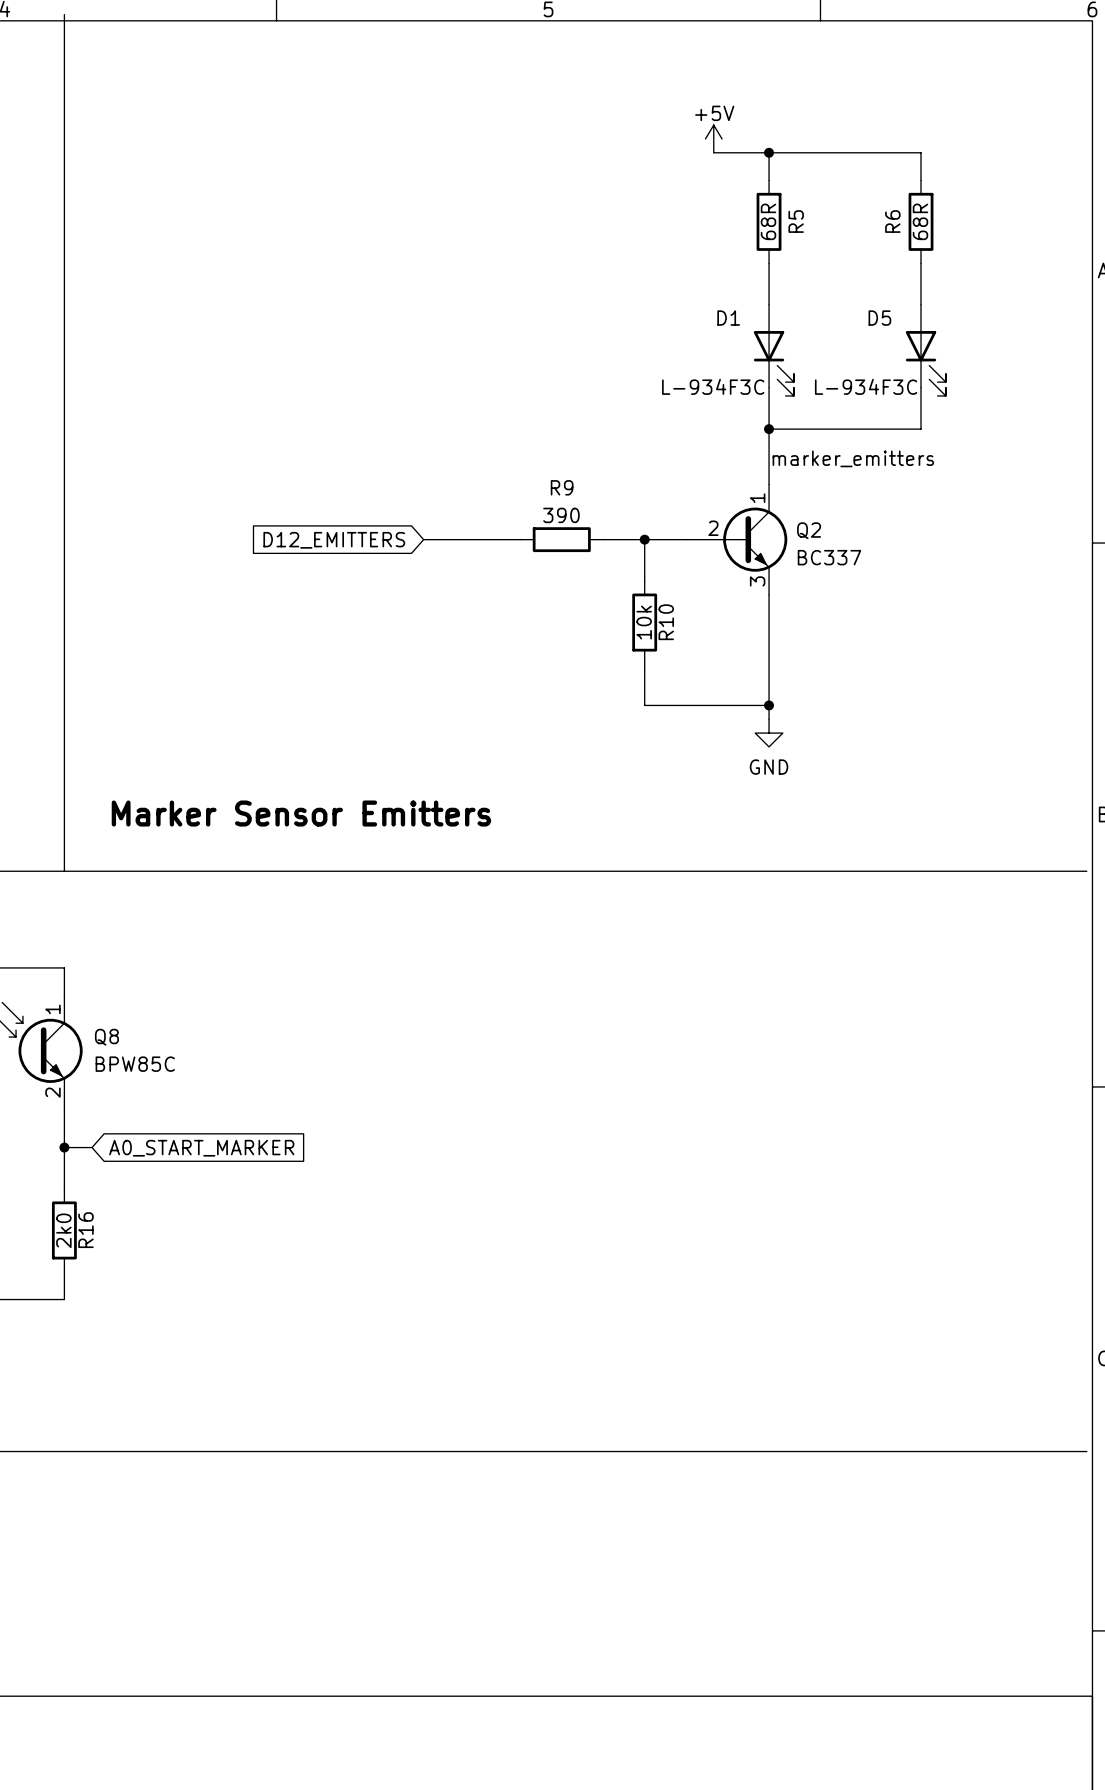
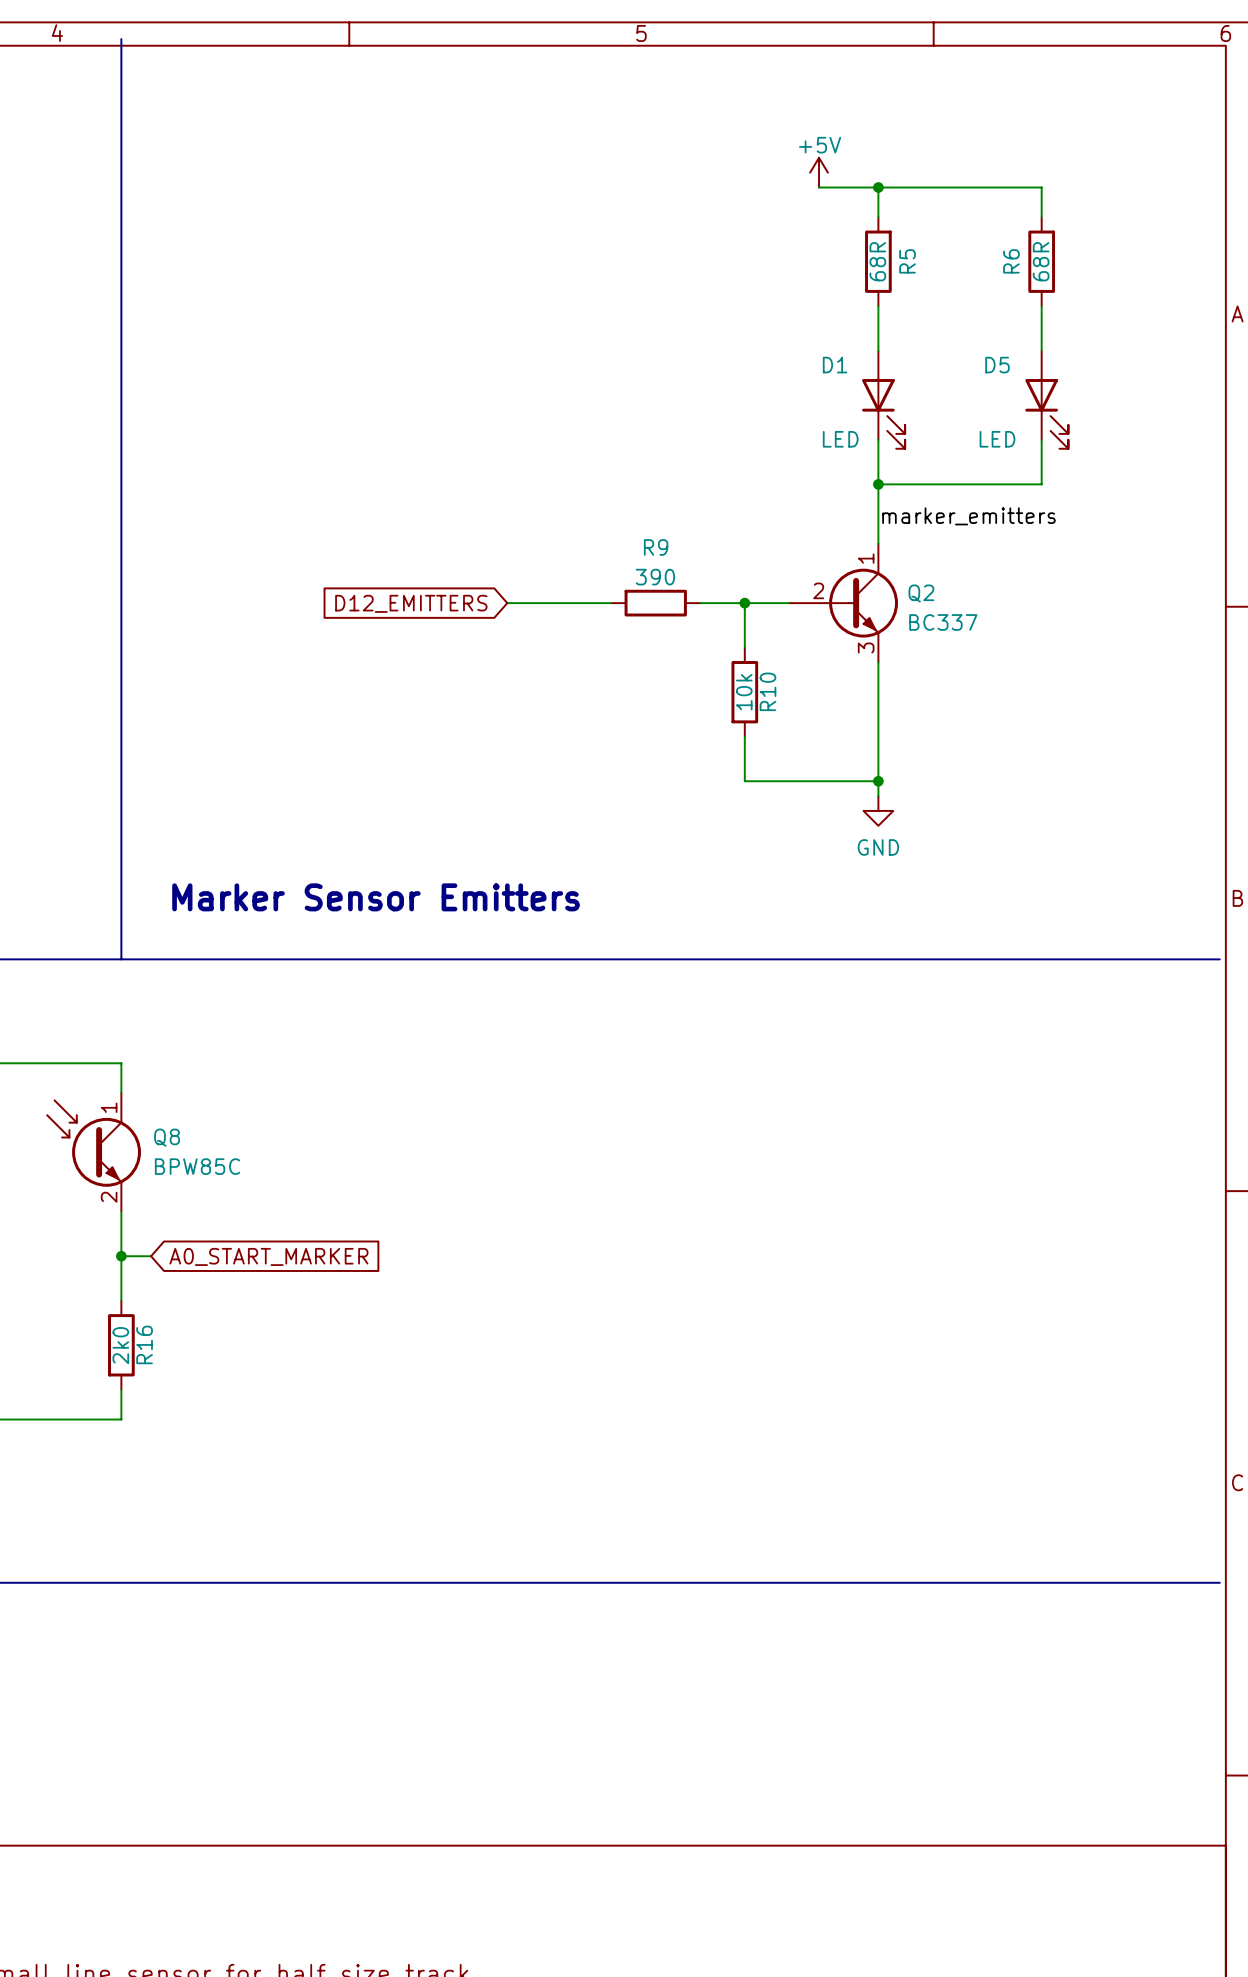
D1 value: L-934F3C (713, 386) -> LED (840, 439)
D5 value: L-934F3C (866, 386) -> LED (997, 439)

